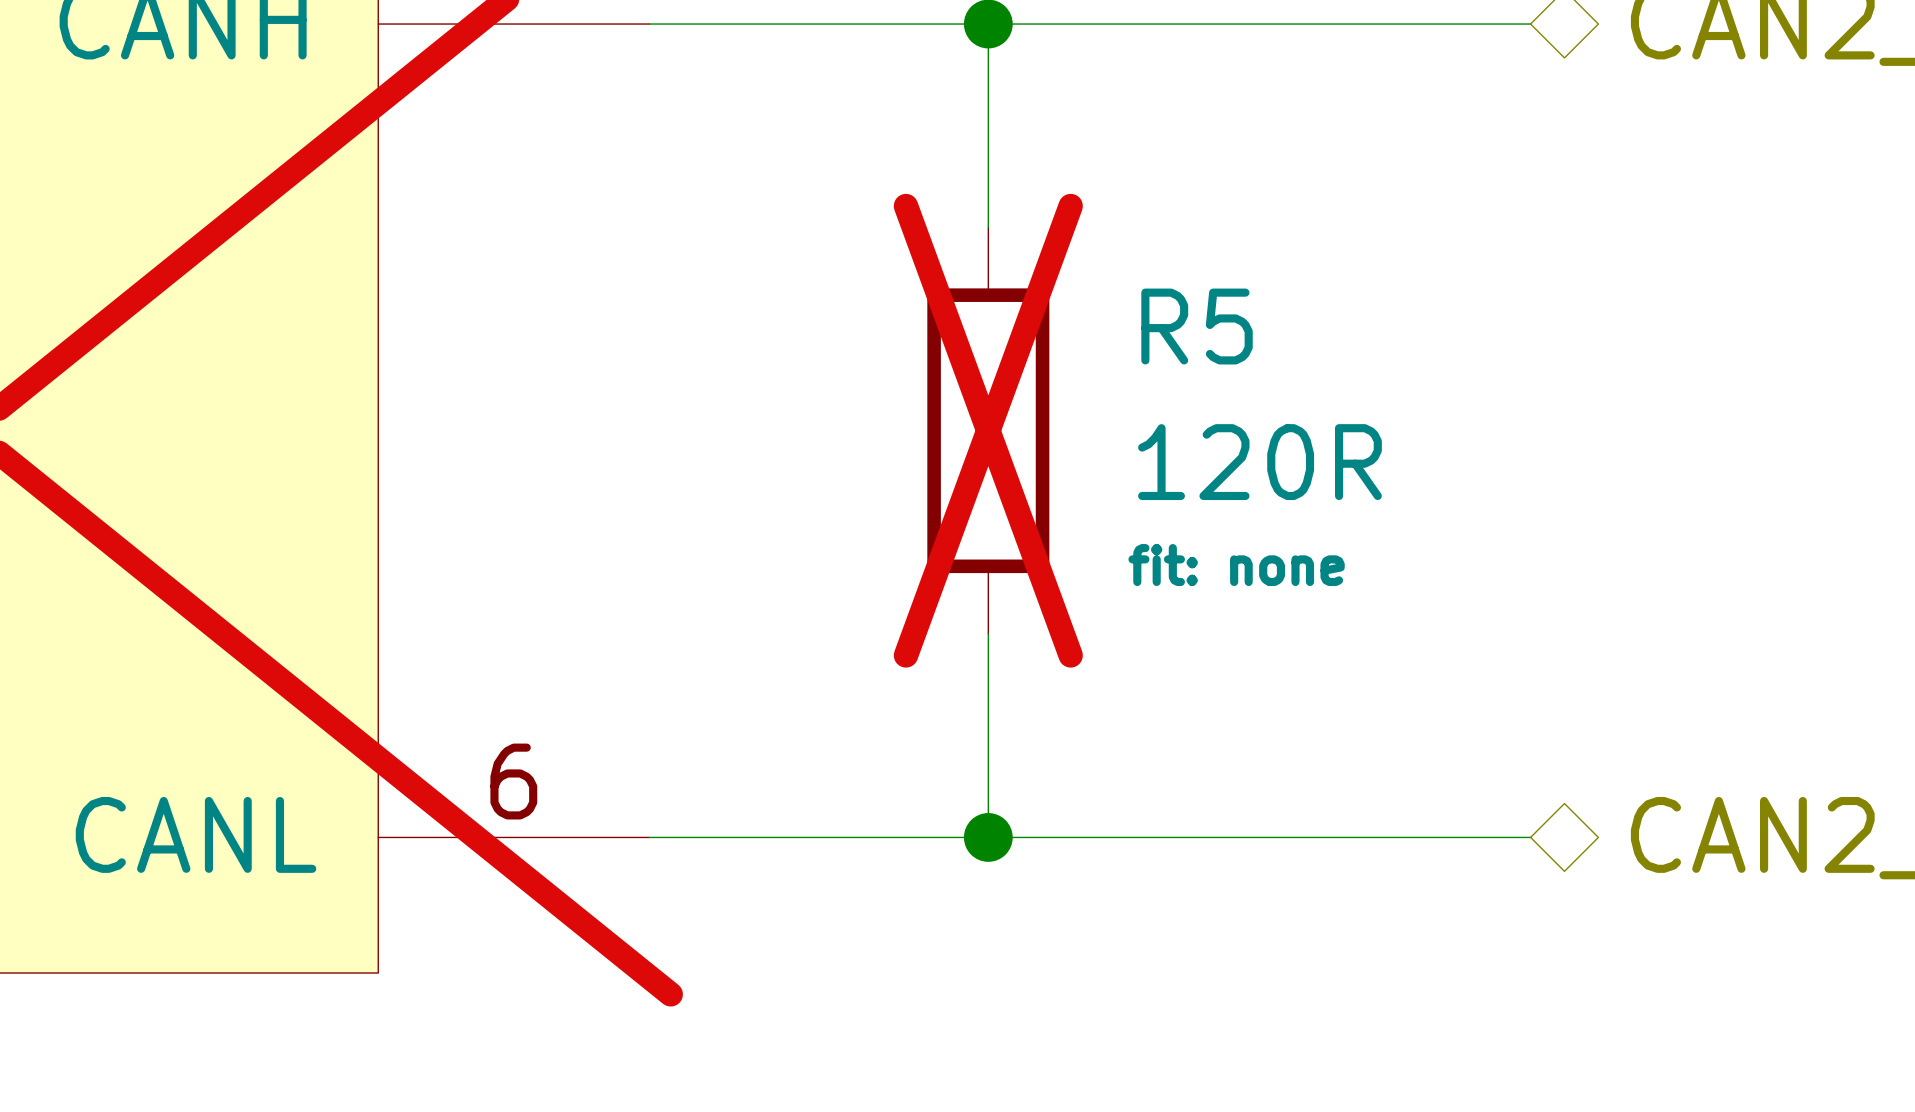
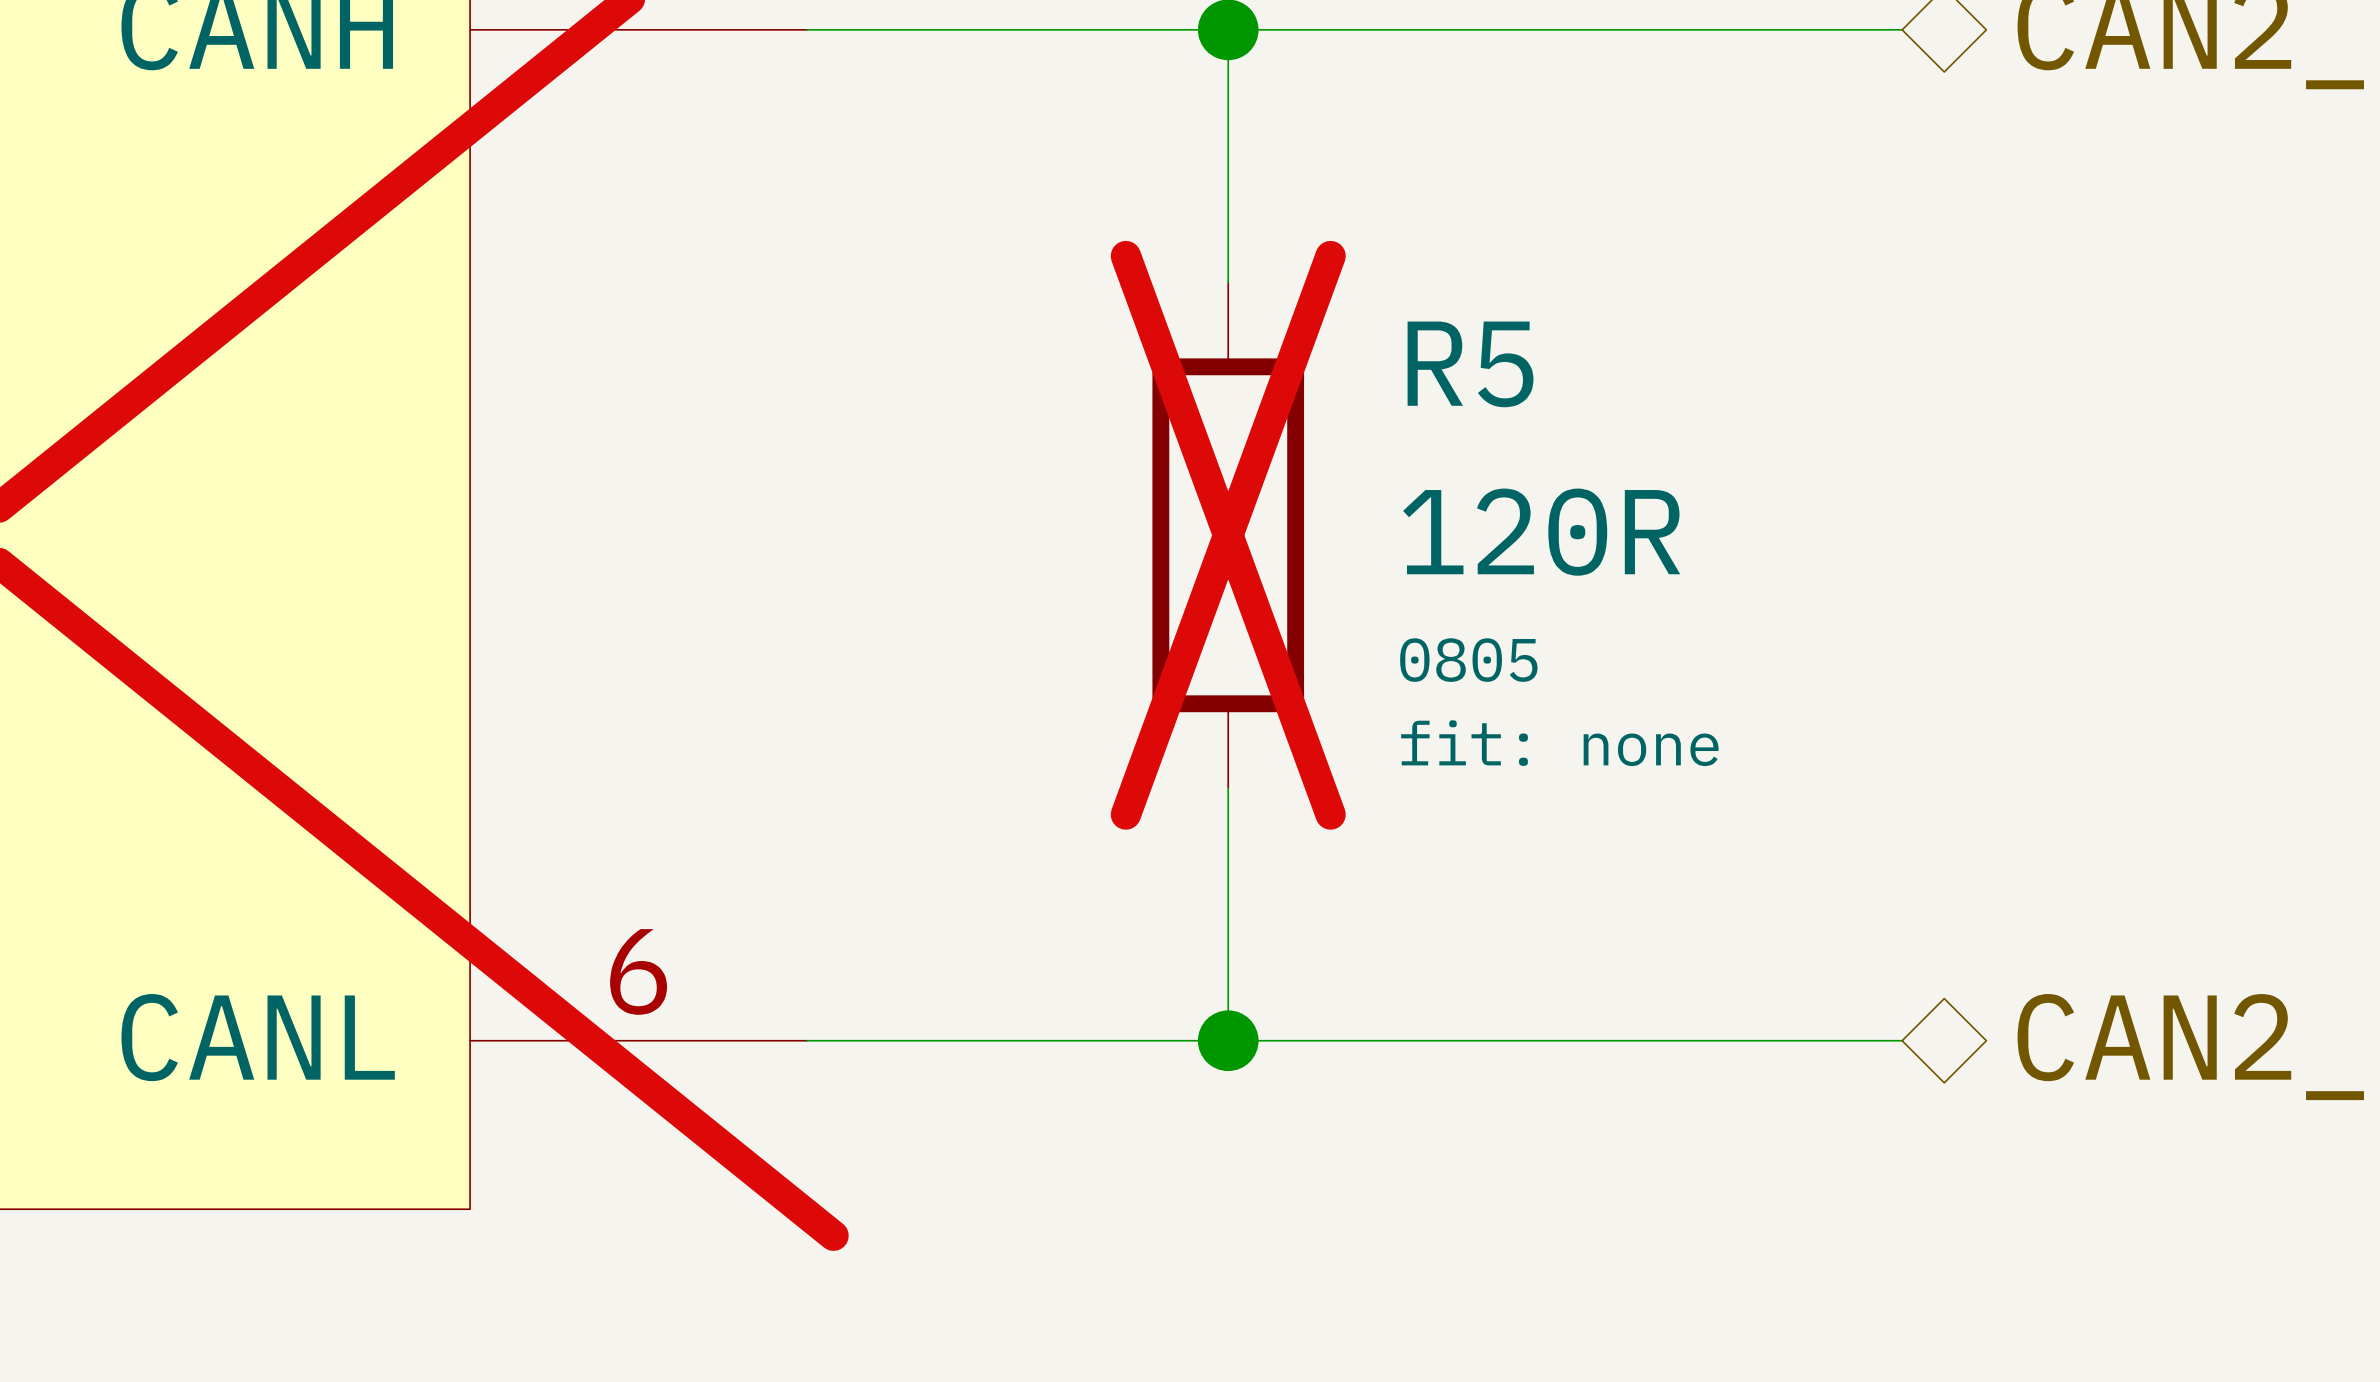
R5 name position: R5 (1197, 326) -> R5 (1470, 364)
R5 text position: 120R (1259, 462) -> 120R (1541, 532)
R5 text: none -> 0805 (1468, 660)
R5 text position: fit: none (1236, 565) -> fit: none (1559, 743)

